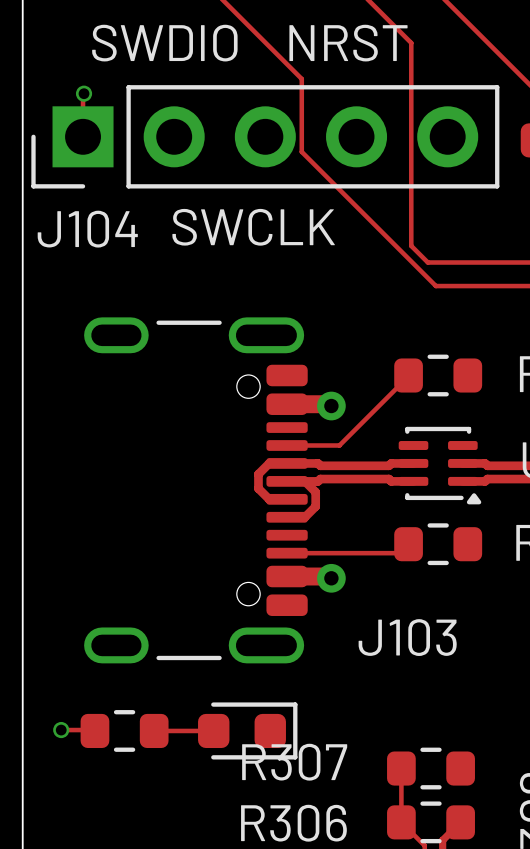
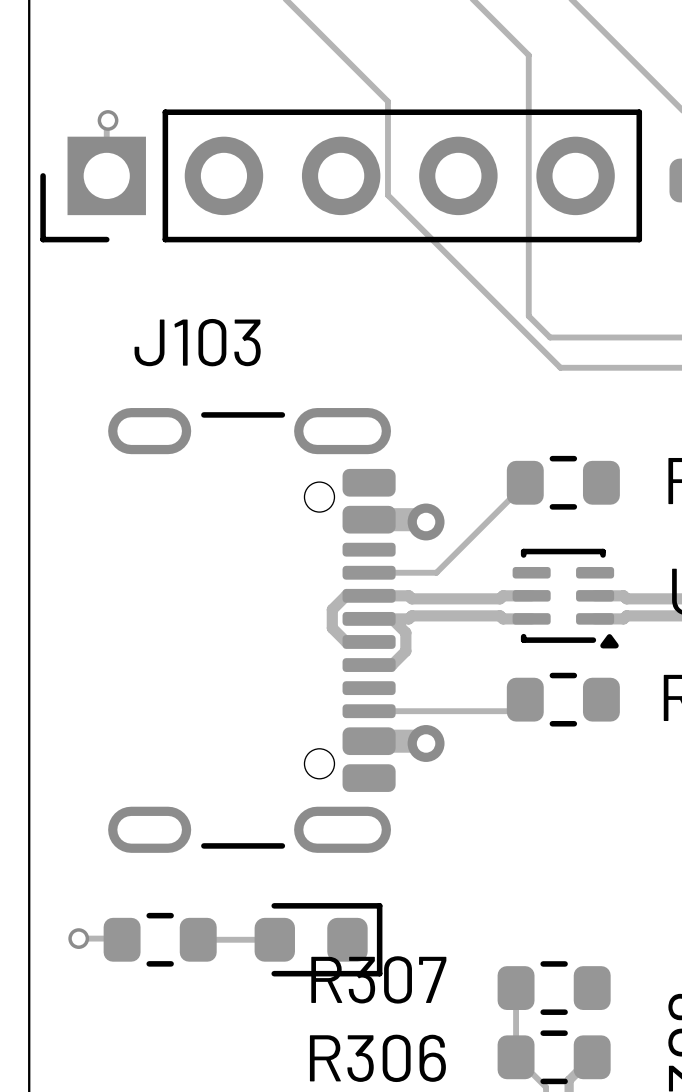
text: SWDIO (164, 43) -> none
text: NRST (348, 43) -> none
text: SWCLK (253, 227) -> none
J104 name: J104 (87, 229) -> none
J103 name position: J103 (407, 637) -> J103 (197, 342)

